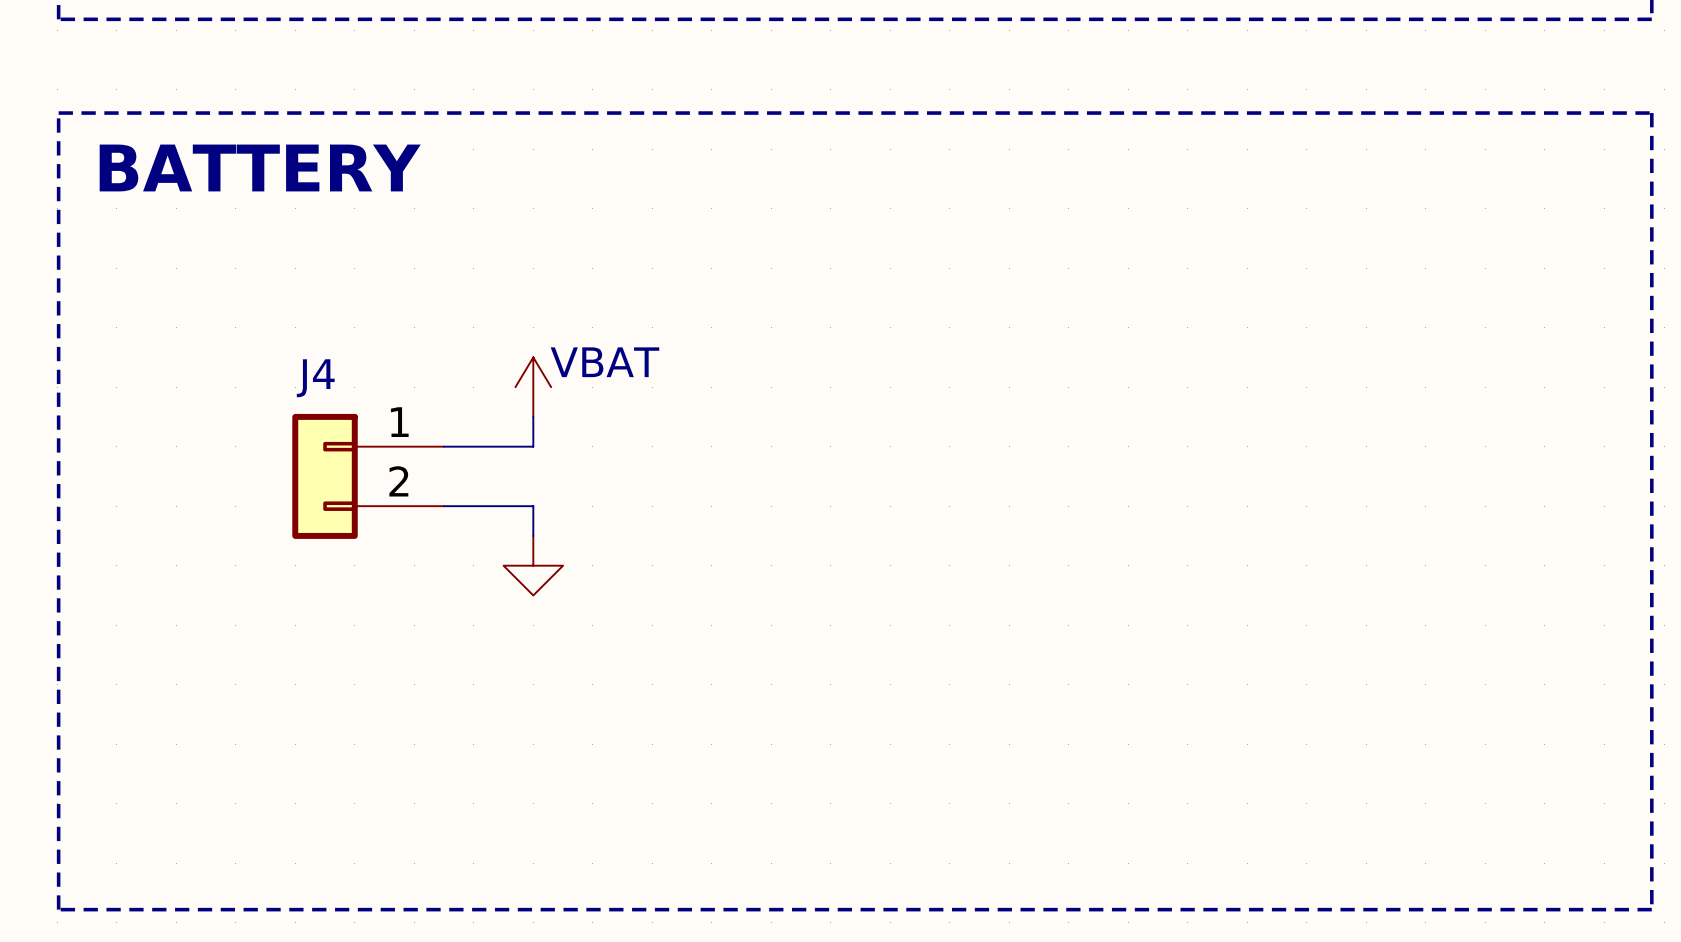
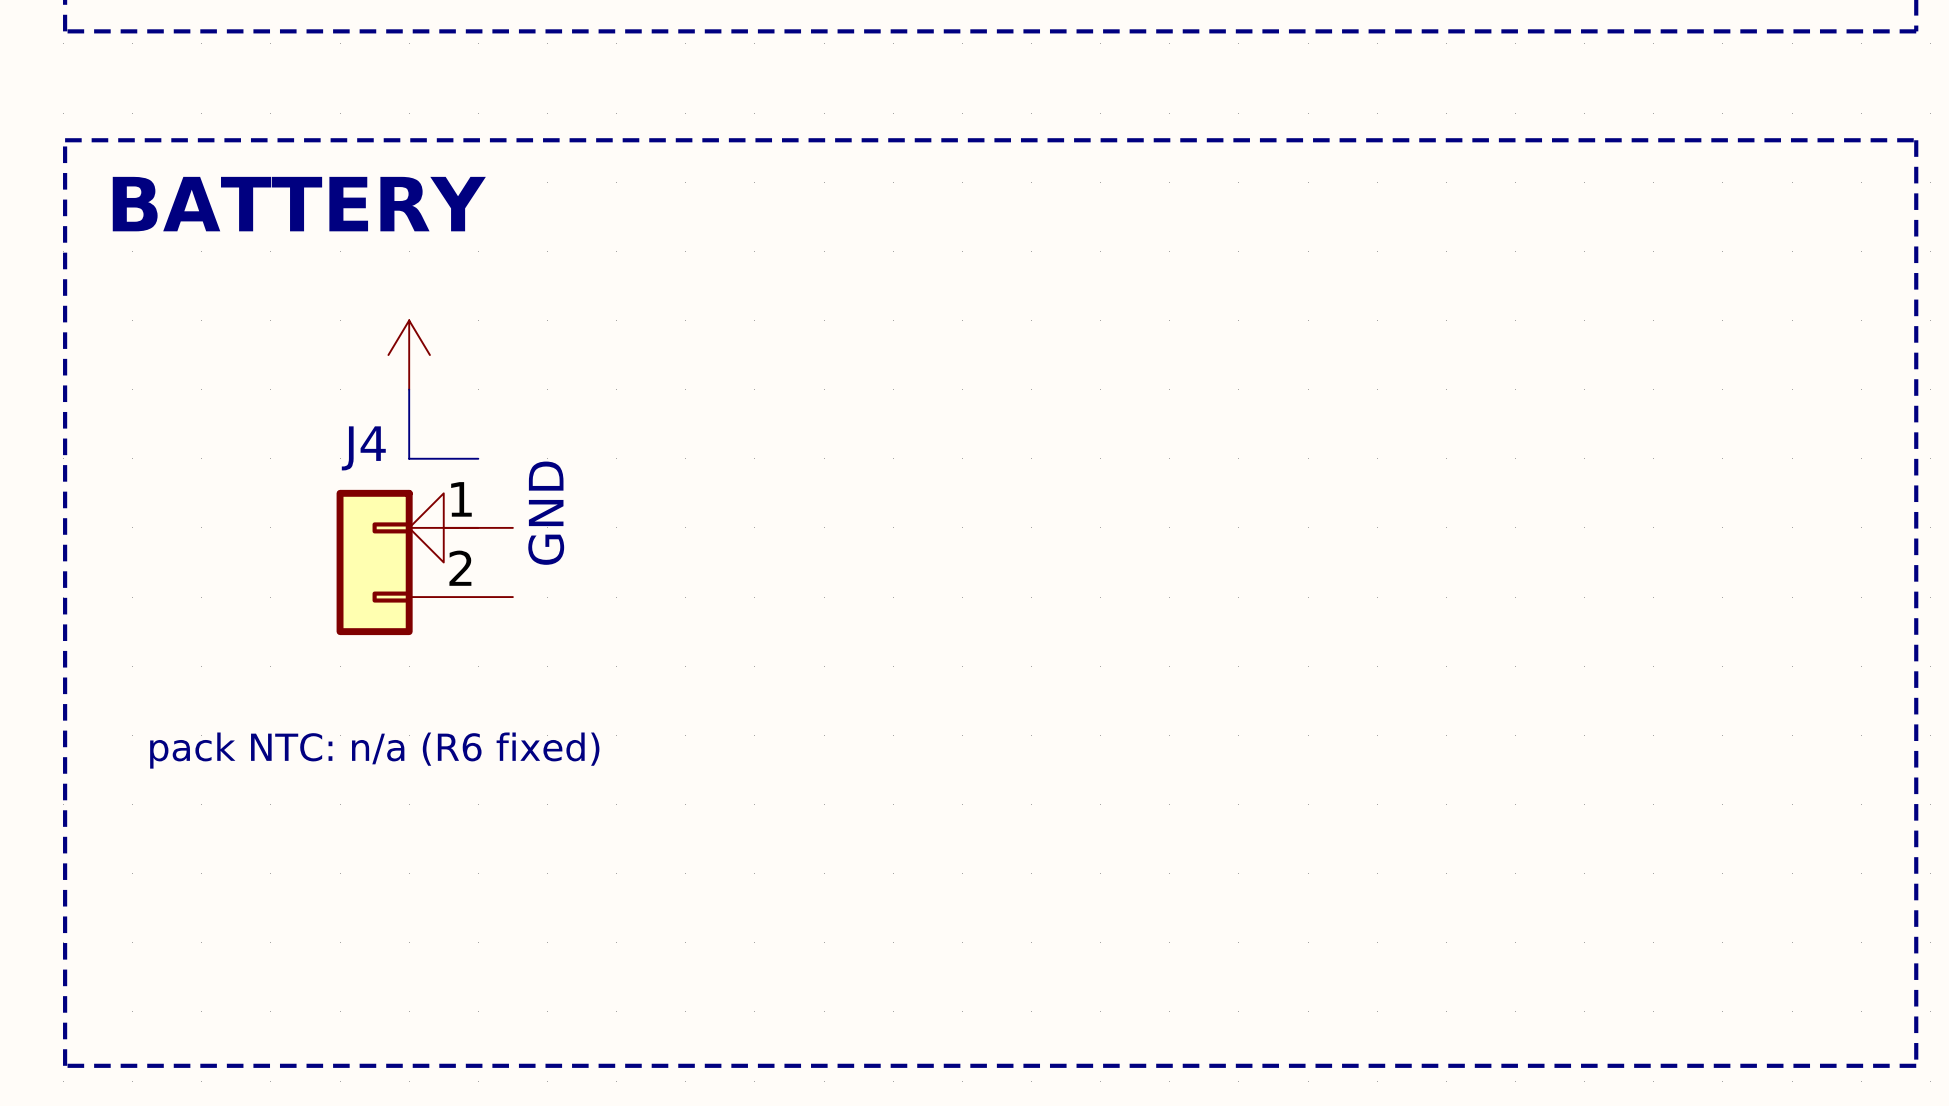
power symbol: none -> (409, 355)
wire: none -> (409, 389) (409, 458) (478, 458)
power symbol: VBAT (533, 387) -> none
wire: (533, 416) (533, 446) (444, 446) -> none
power symbol: none -> GND (443, 527)
wire: (444, 506) (533, 506) (533, 535) -> none
power symbol: (533, 565) -> none
text: none -> pack NTC: n/a (R6 fixed) (374, 750)

